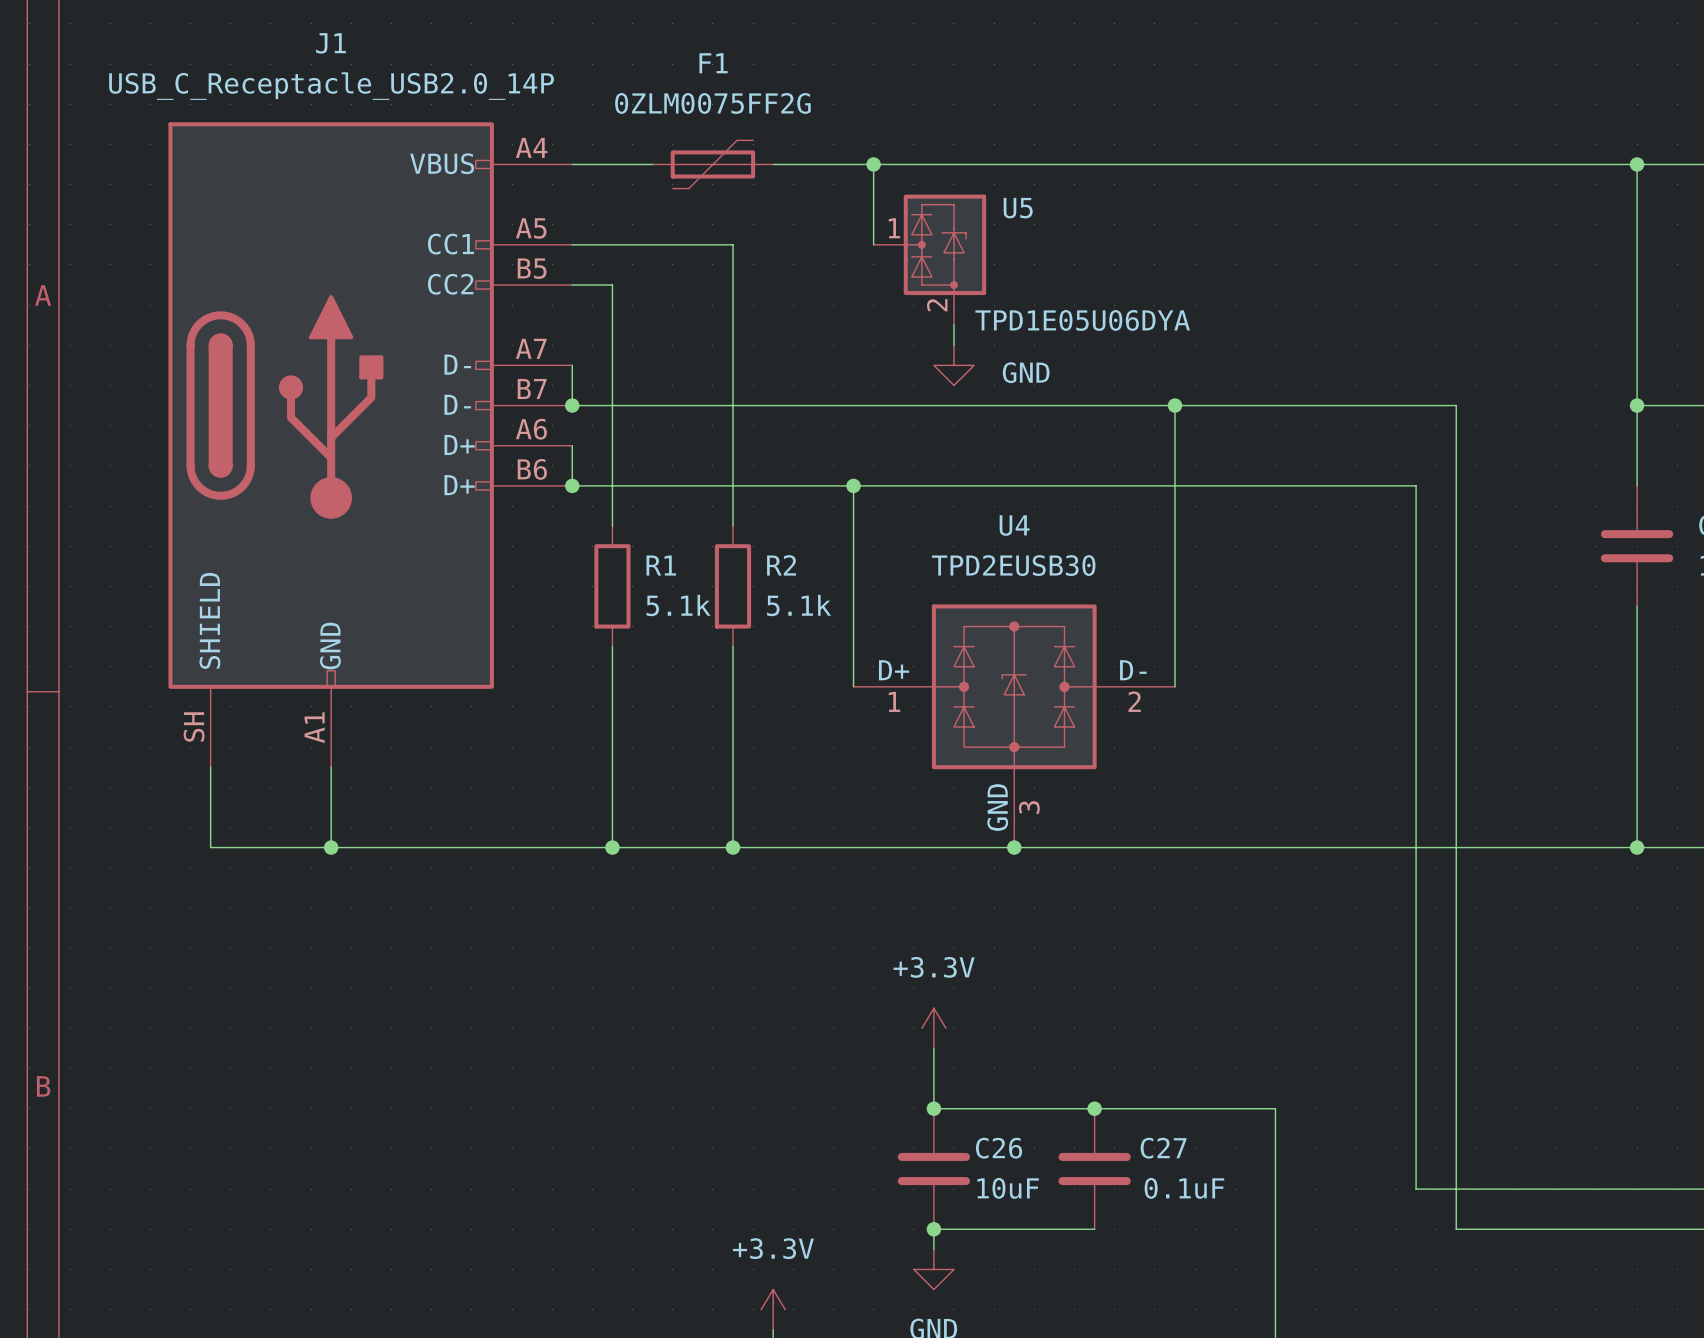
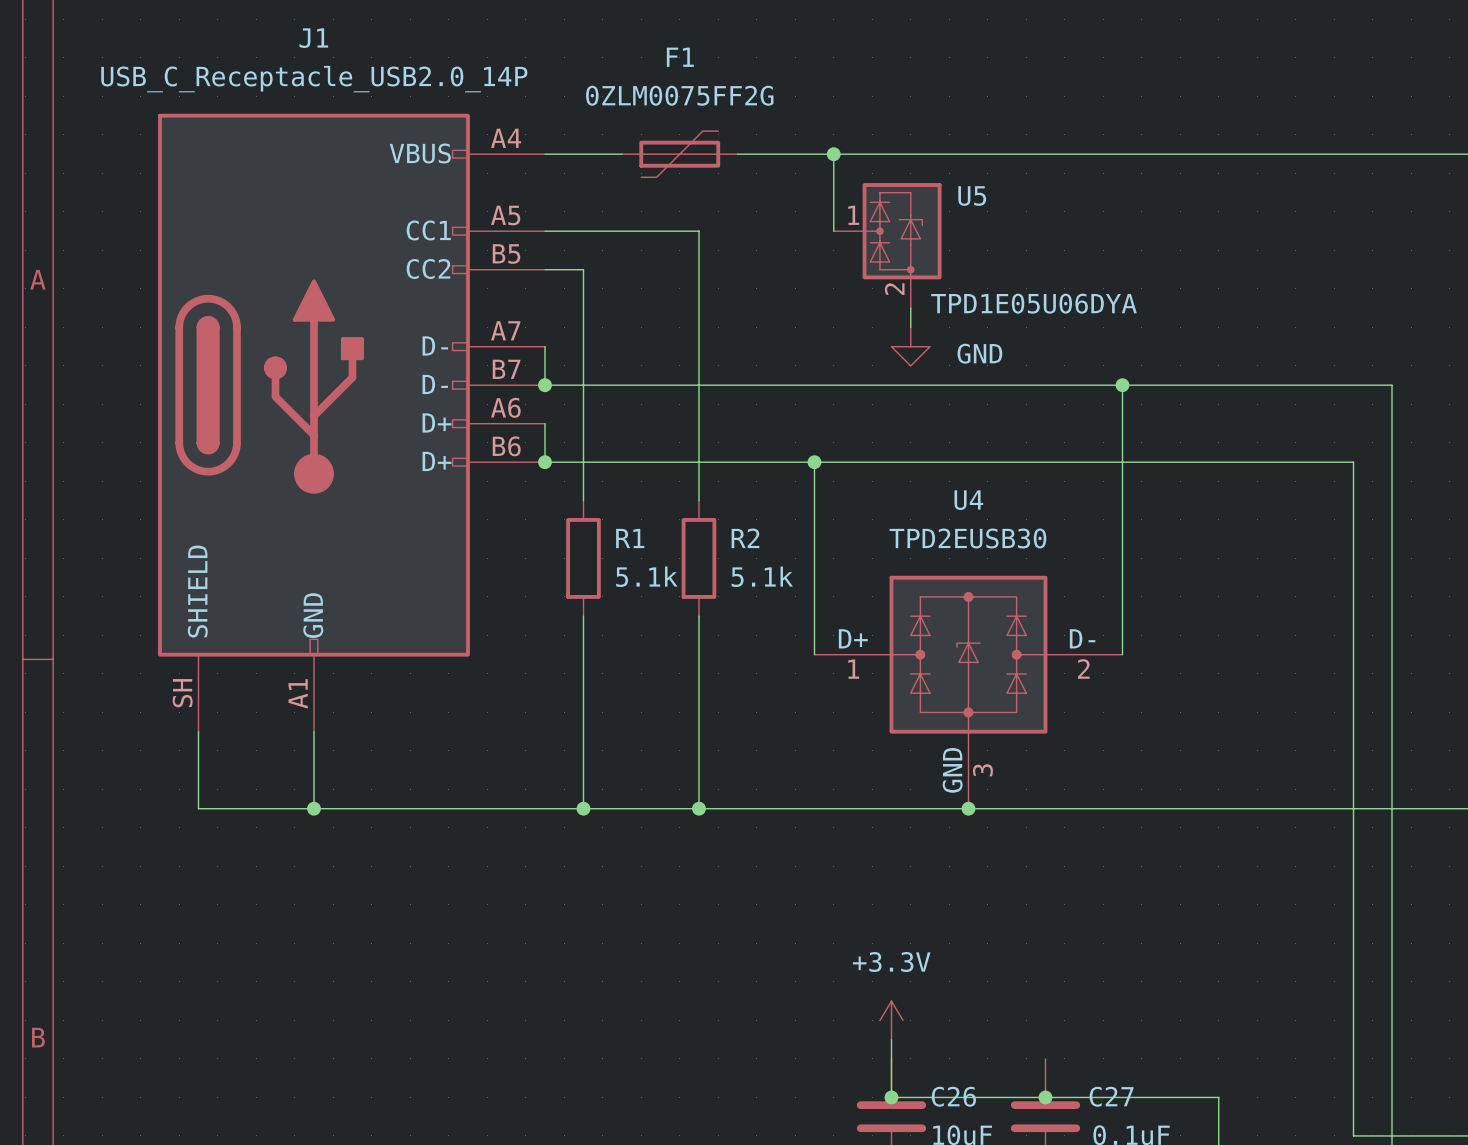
power symbol position: +3.3V (933, 1028) -> +3.3V (891, 1020)
wire: (933, 1108) (1275, 1108) (1275, 1148) -> (891, 1058) (891, 1097) (1218, 1097)
junction position: (933, 1108) -> (891, 1097)
junction position: (1094, 1108) -> (1045, 1097)

